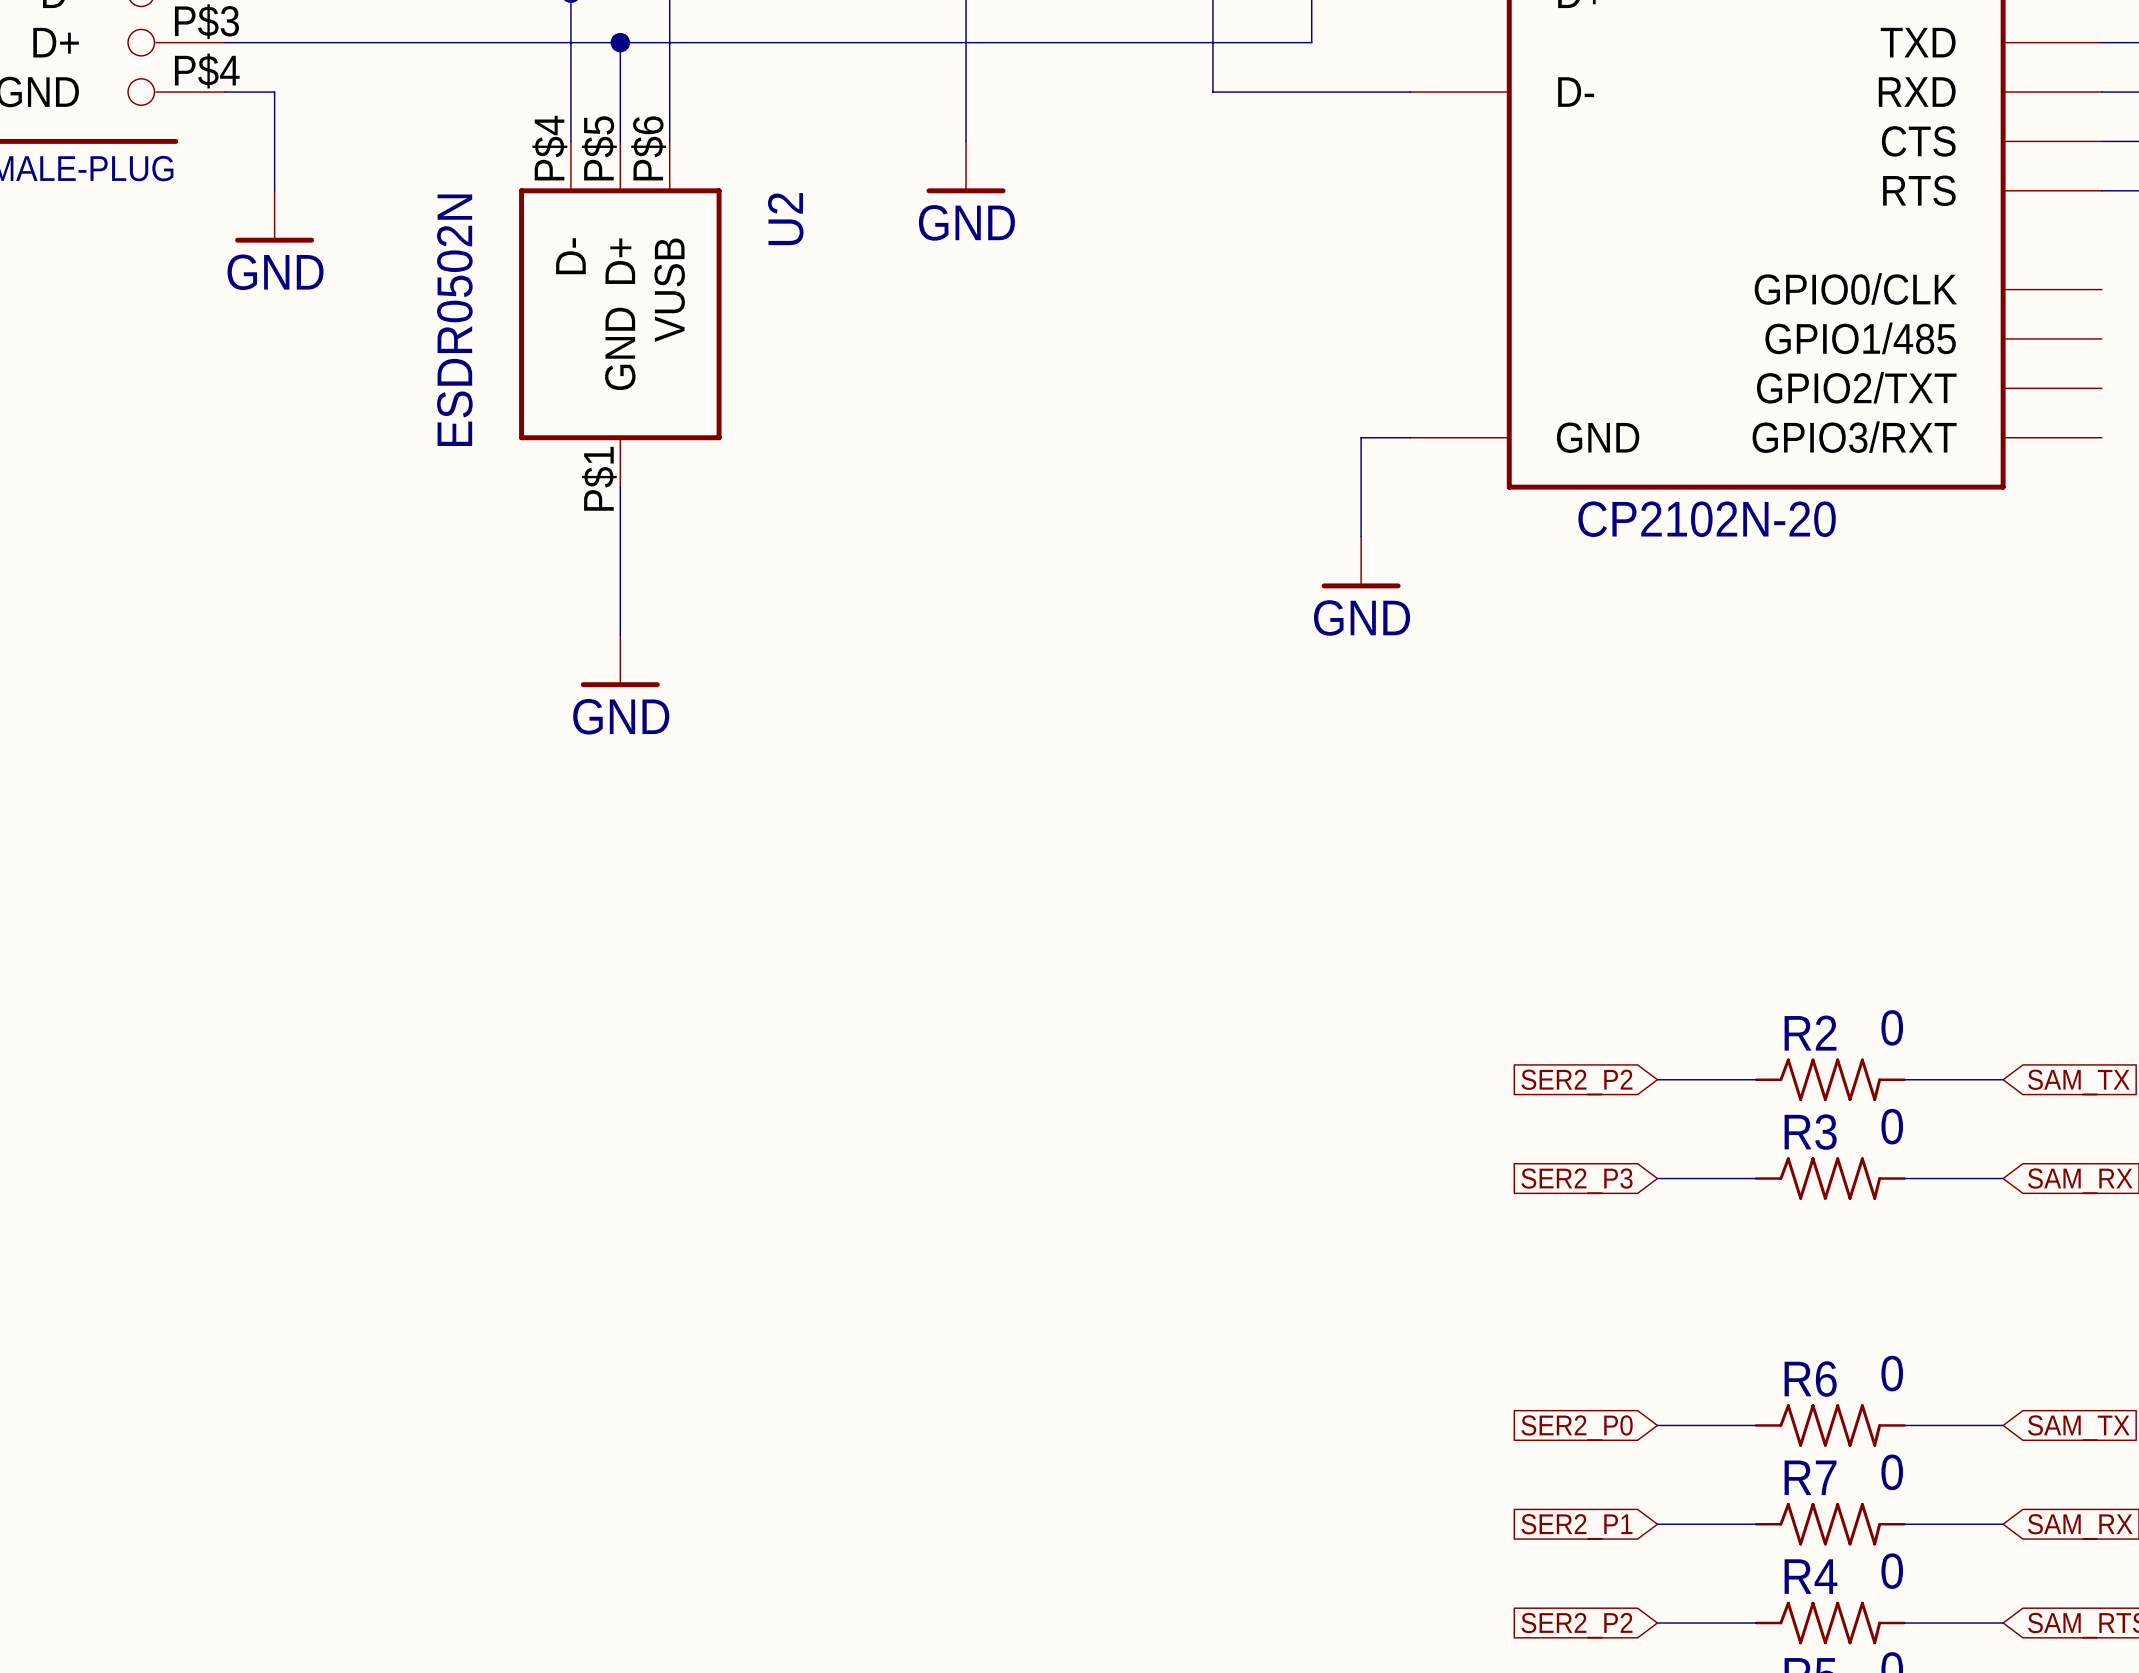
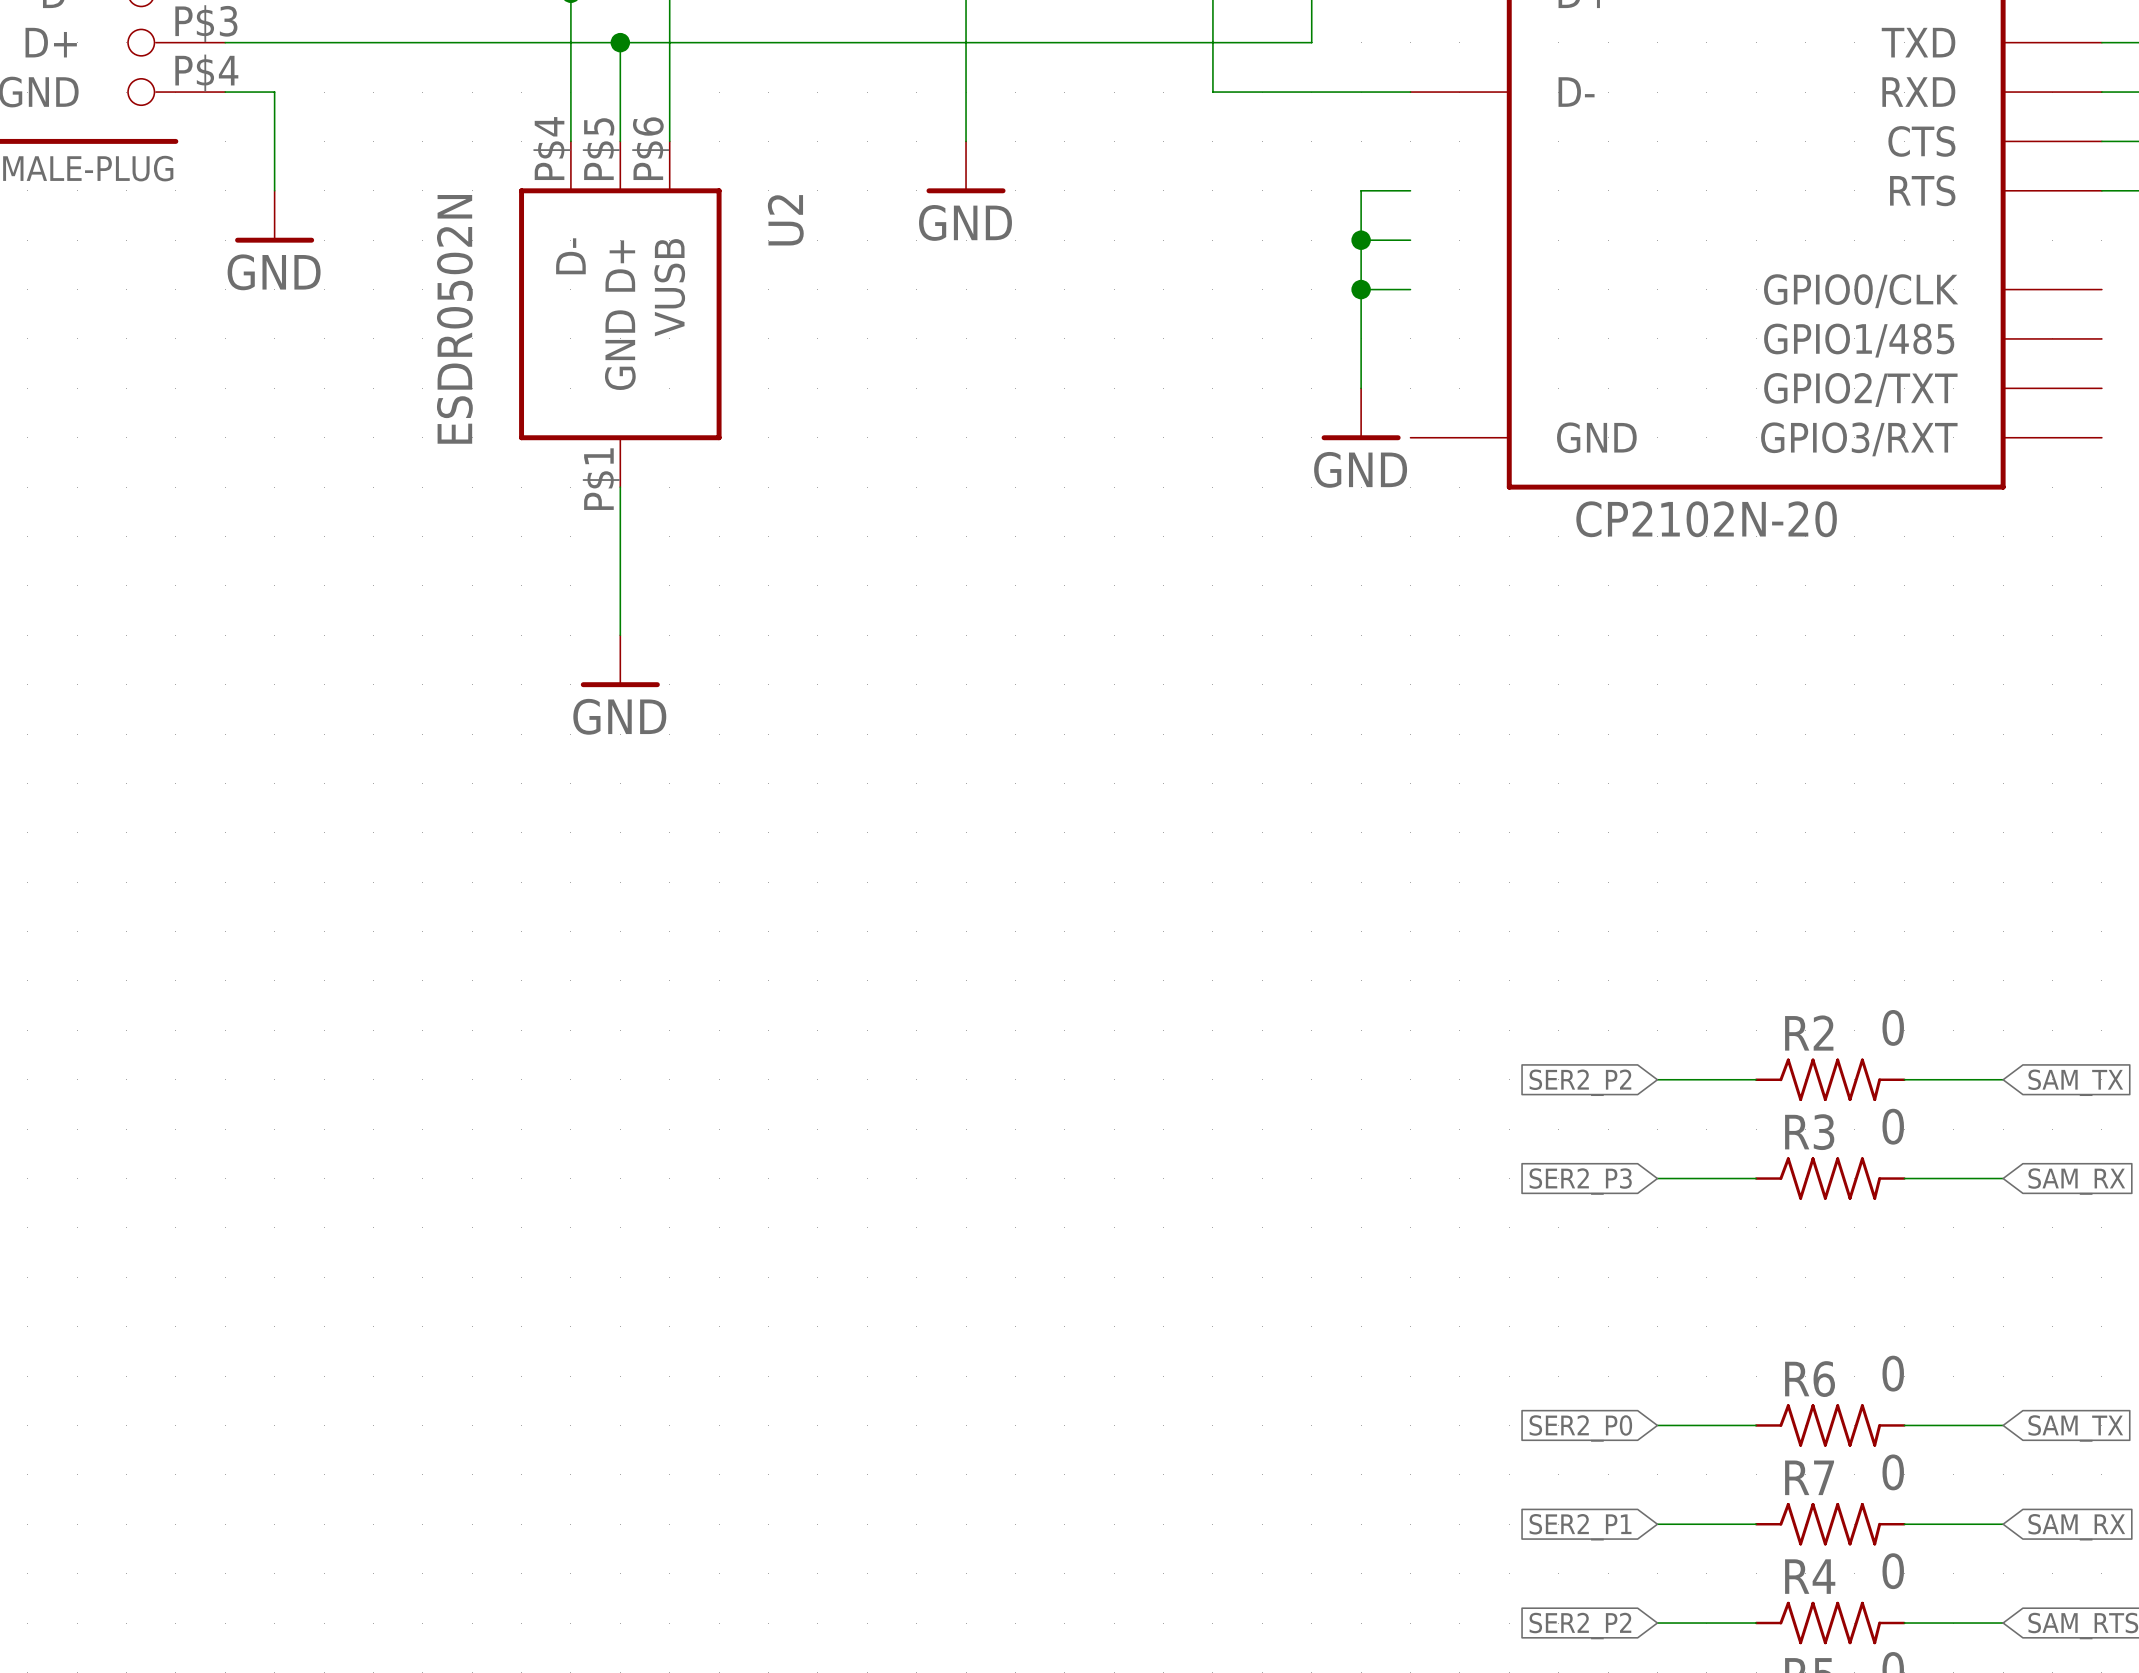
wire: none -> (1410, 190) (1361, 190) (1361, 388)
wire: none -> (1361, 240) (1410, 240)
junction: none -> (1361, 240)
wire: none -> (1361, 289) (1410, 289)
junction: none -> (1361, 289)
wire: (1410, 437) (1361, 437) (1361, 536) -> none
power symbol position: GND (1361, 562) -> GND (1361, 414)

